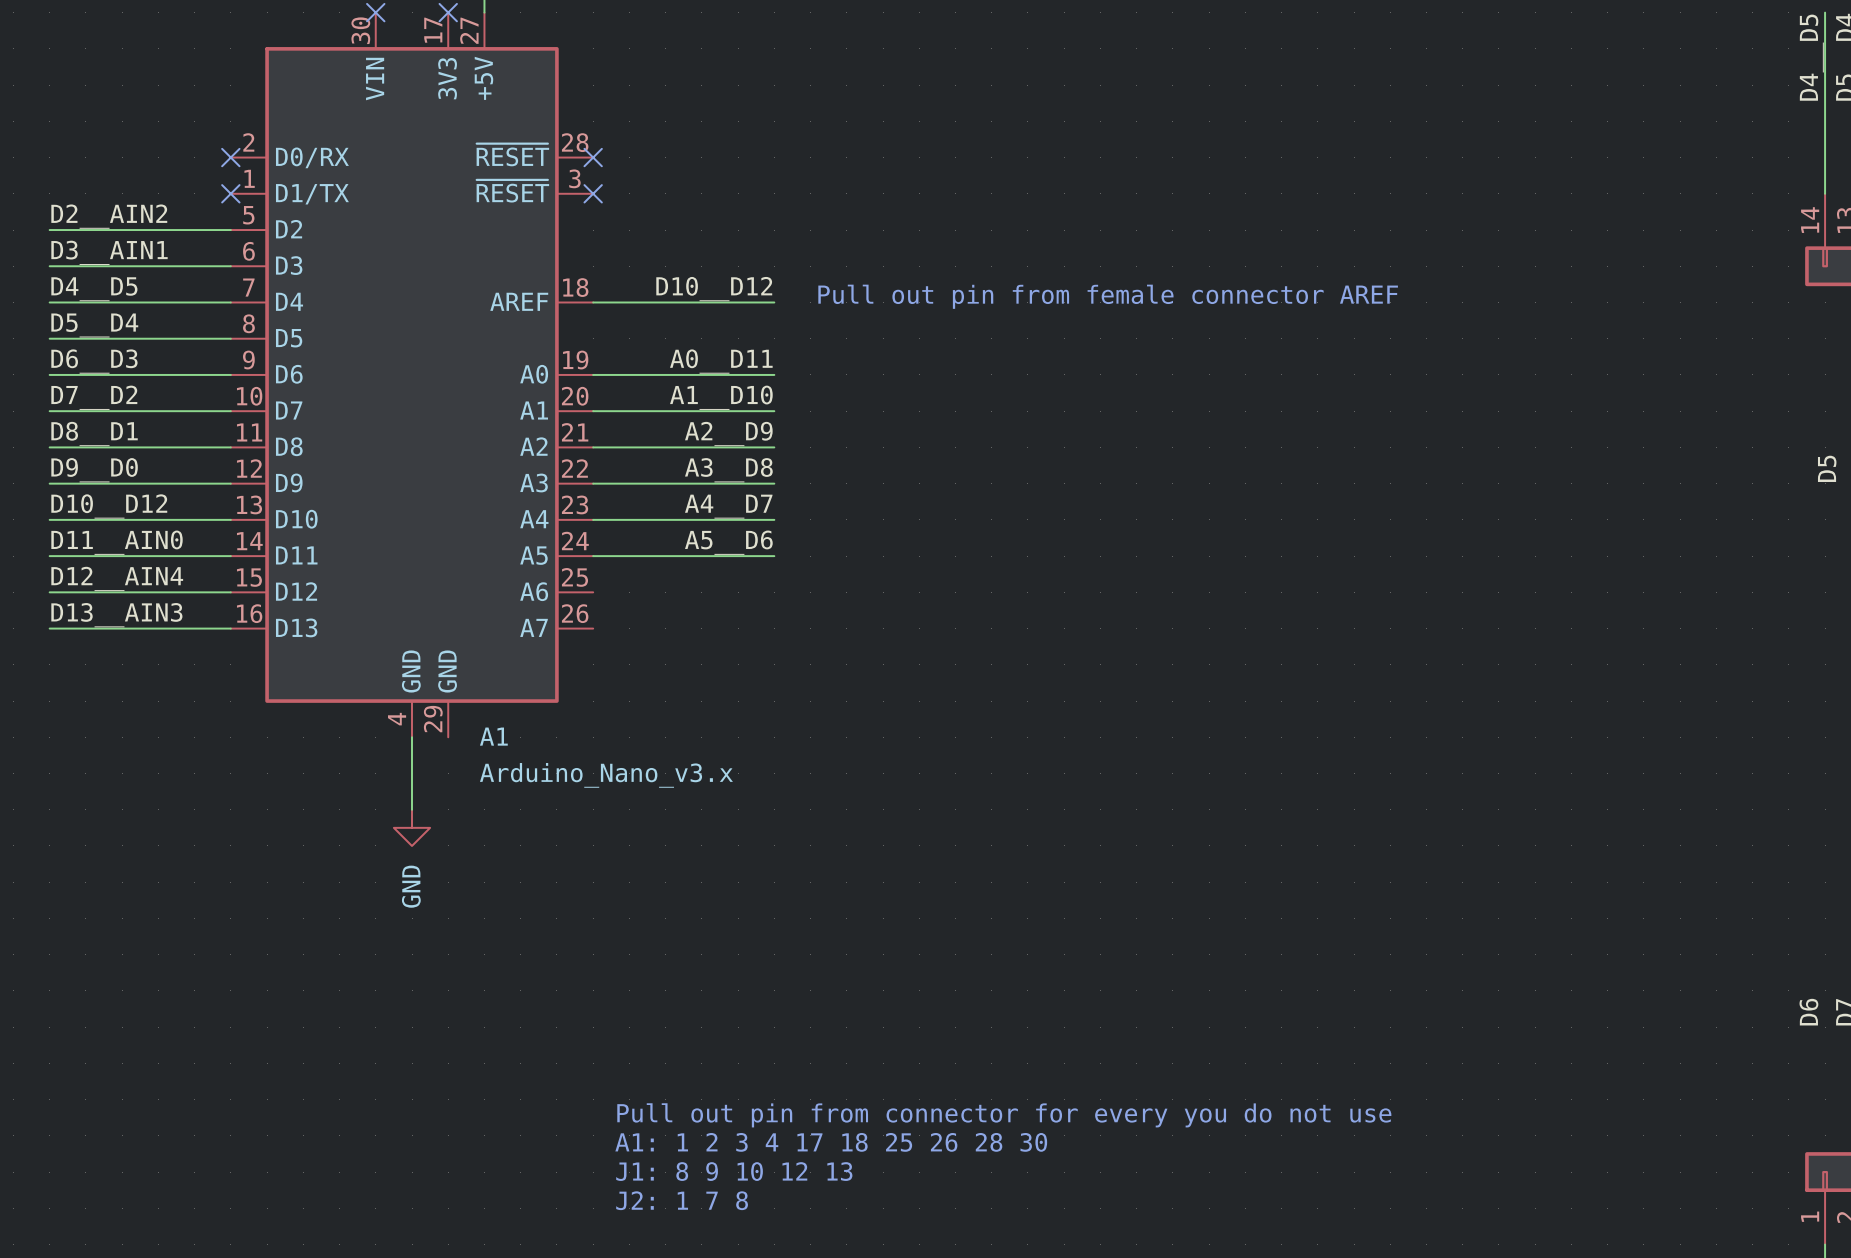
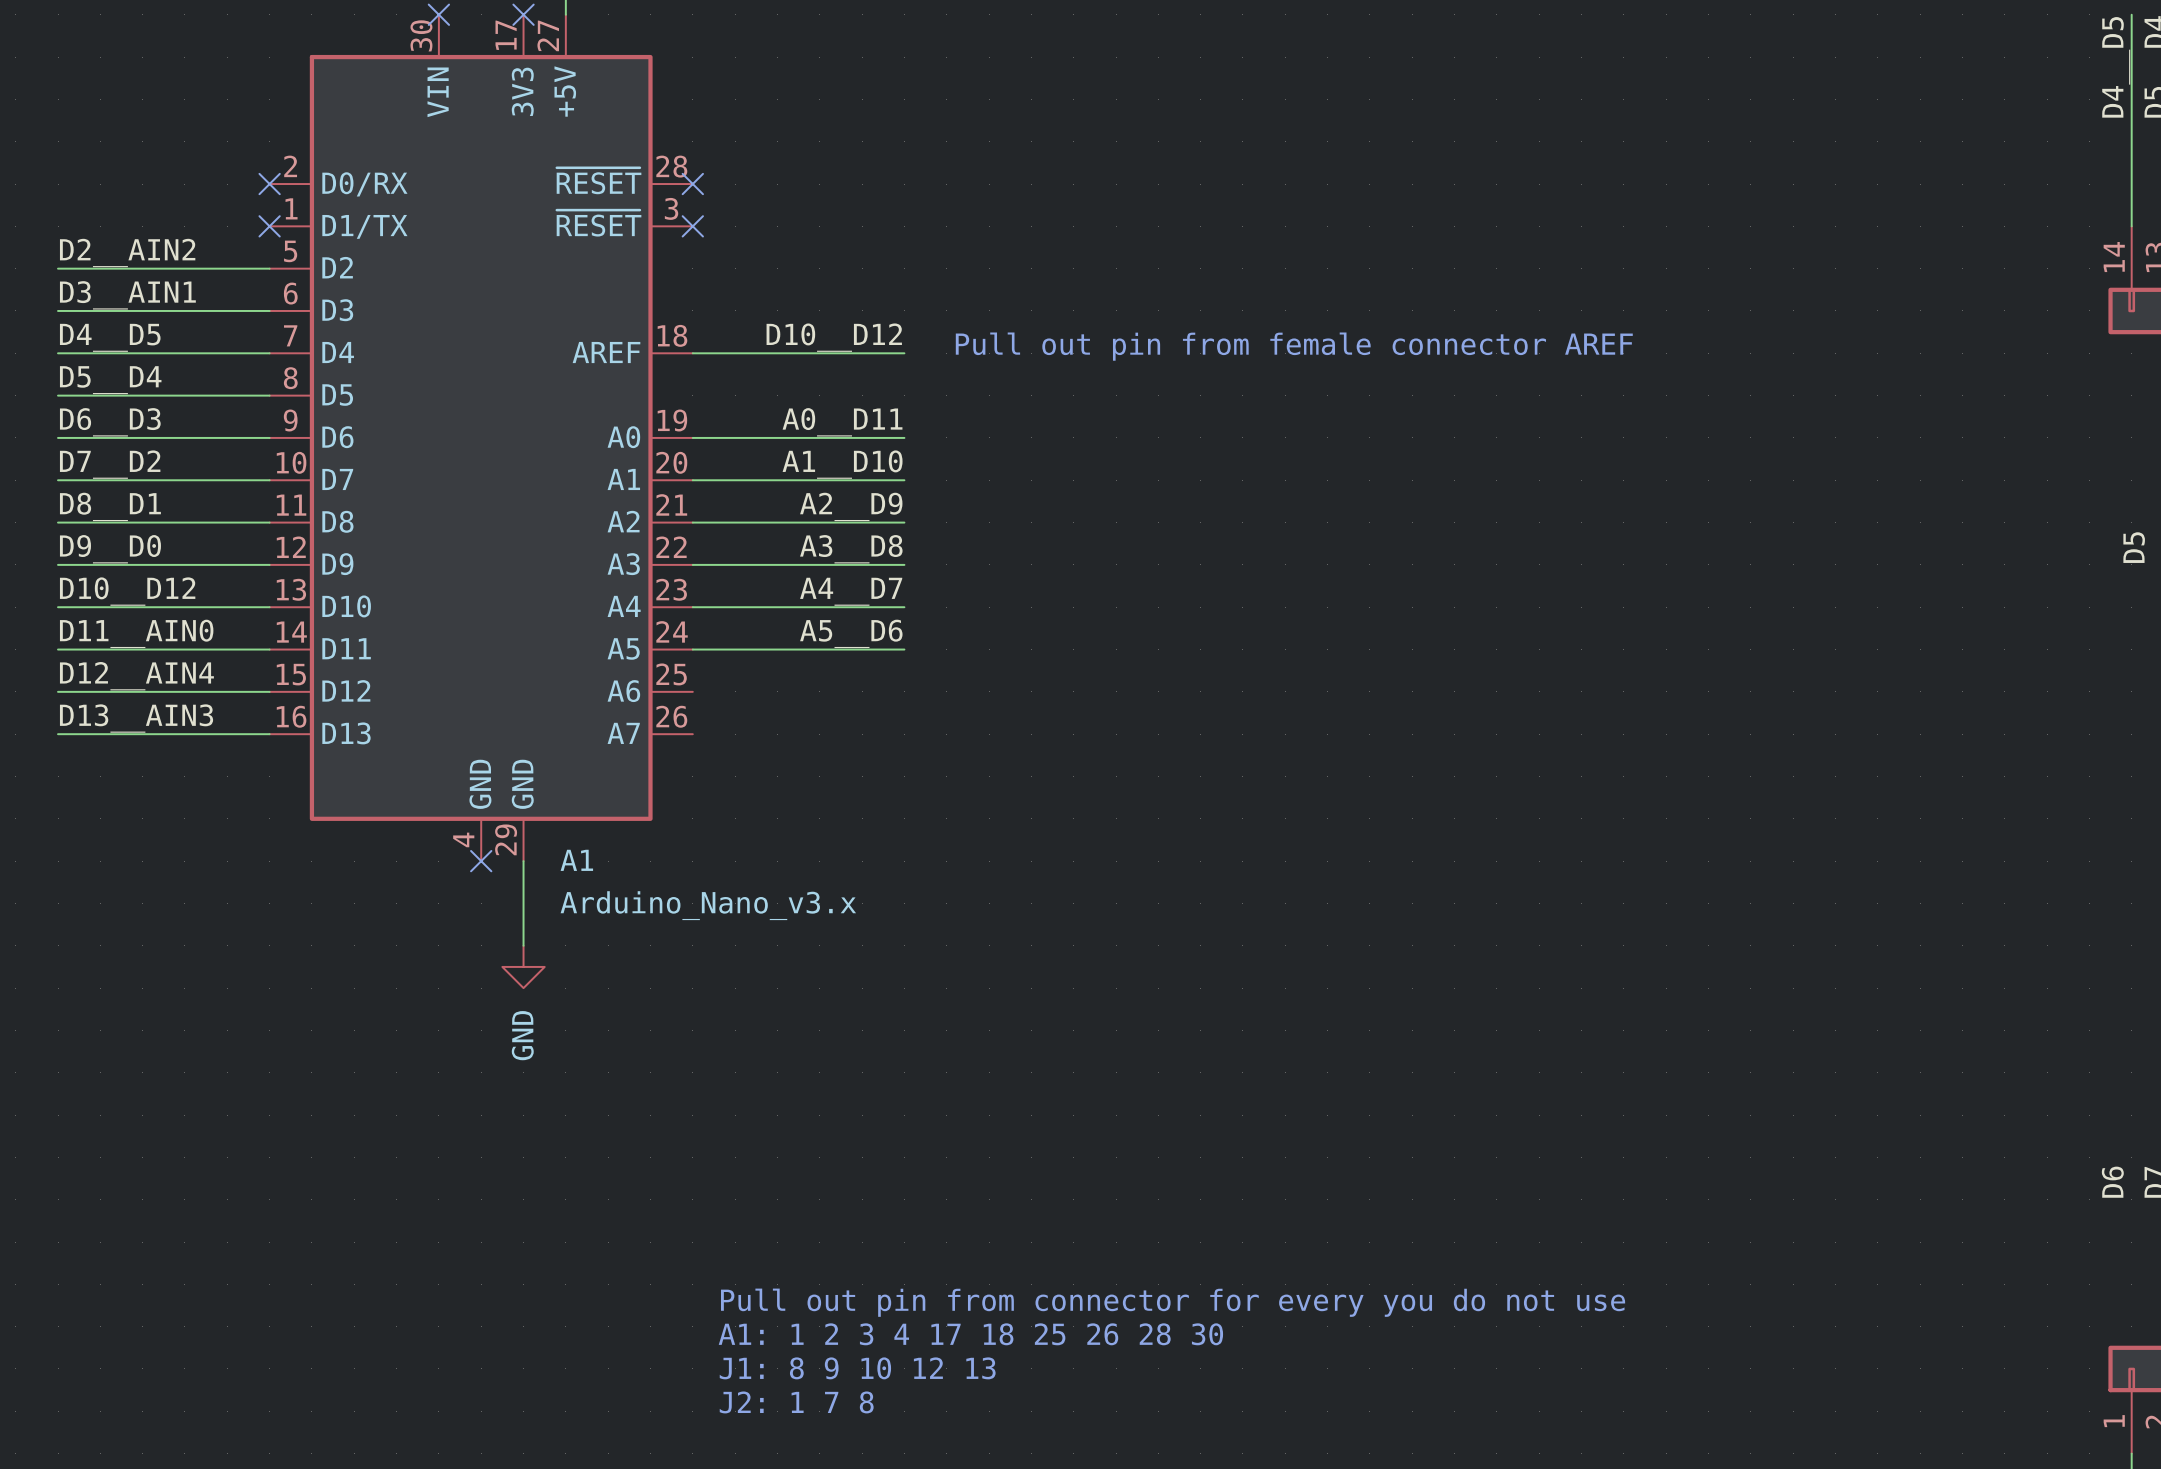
wire: (412, 737) (412, 809) -> (523, 861) (523, 945)
no-connect mark: none -> (481, 861)
power symbol position: GND (412, 827) -> GND (523, 966)

